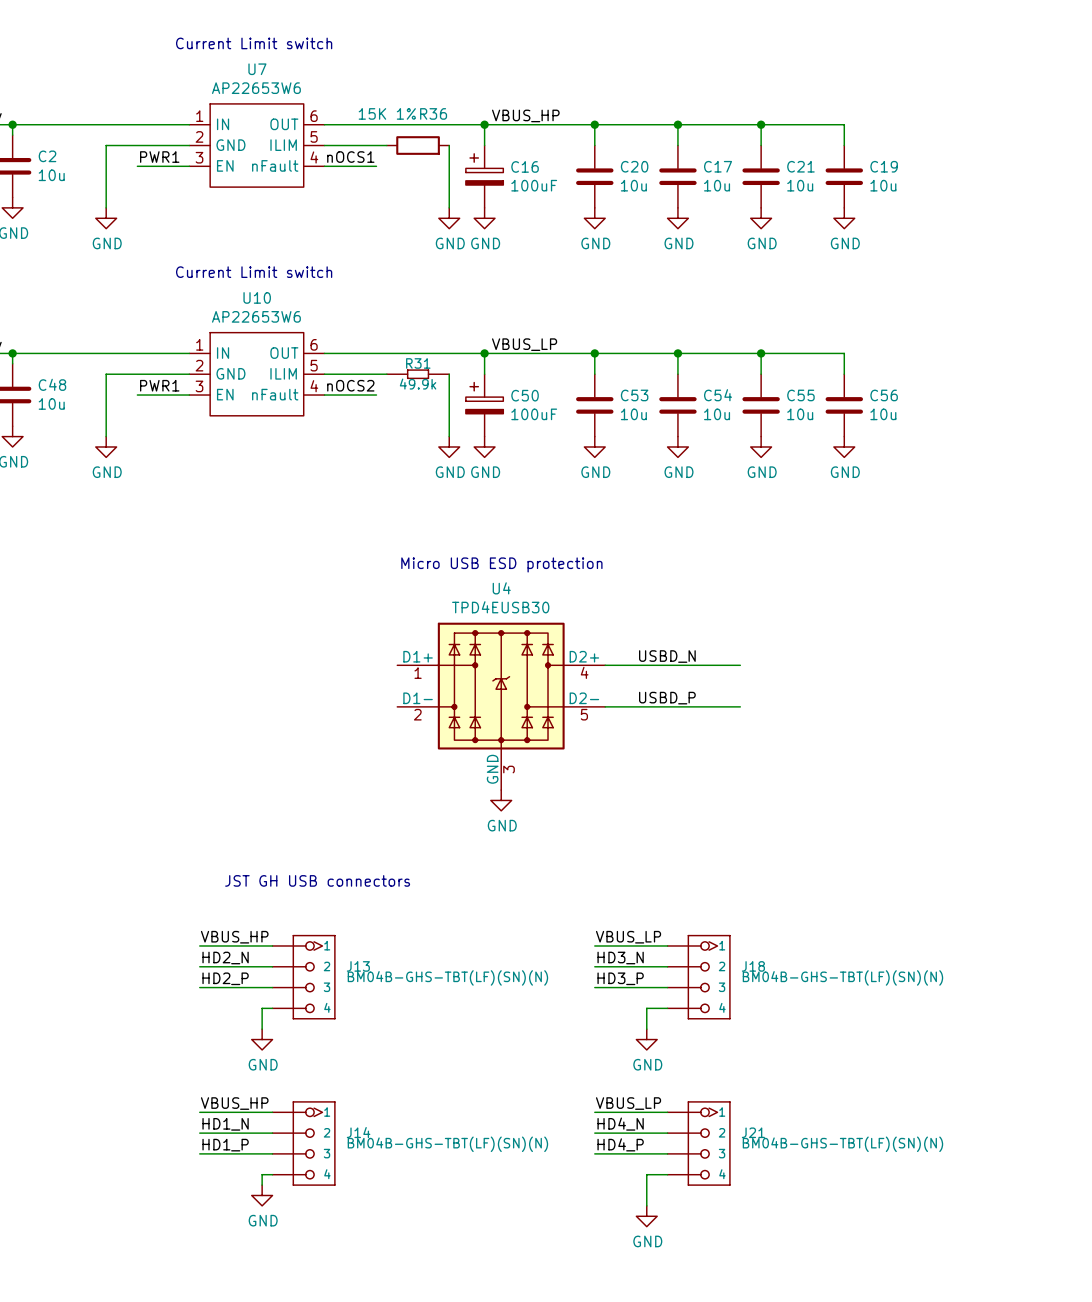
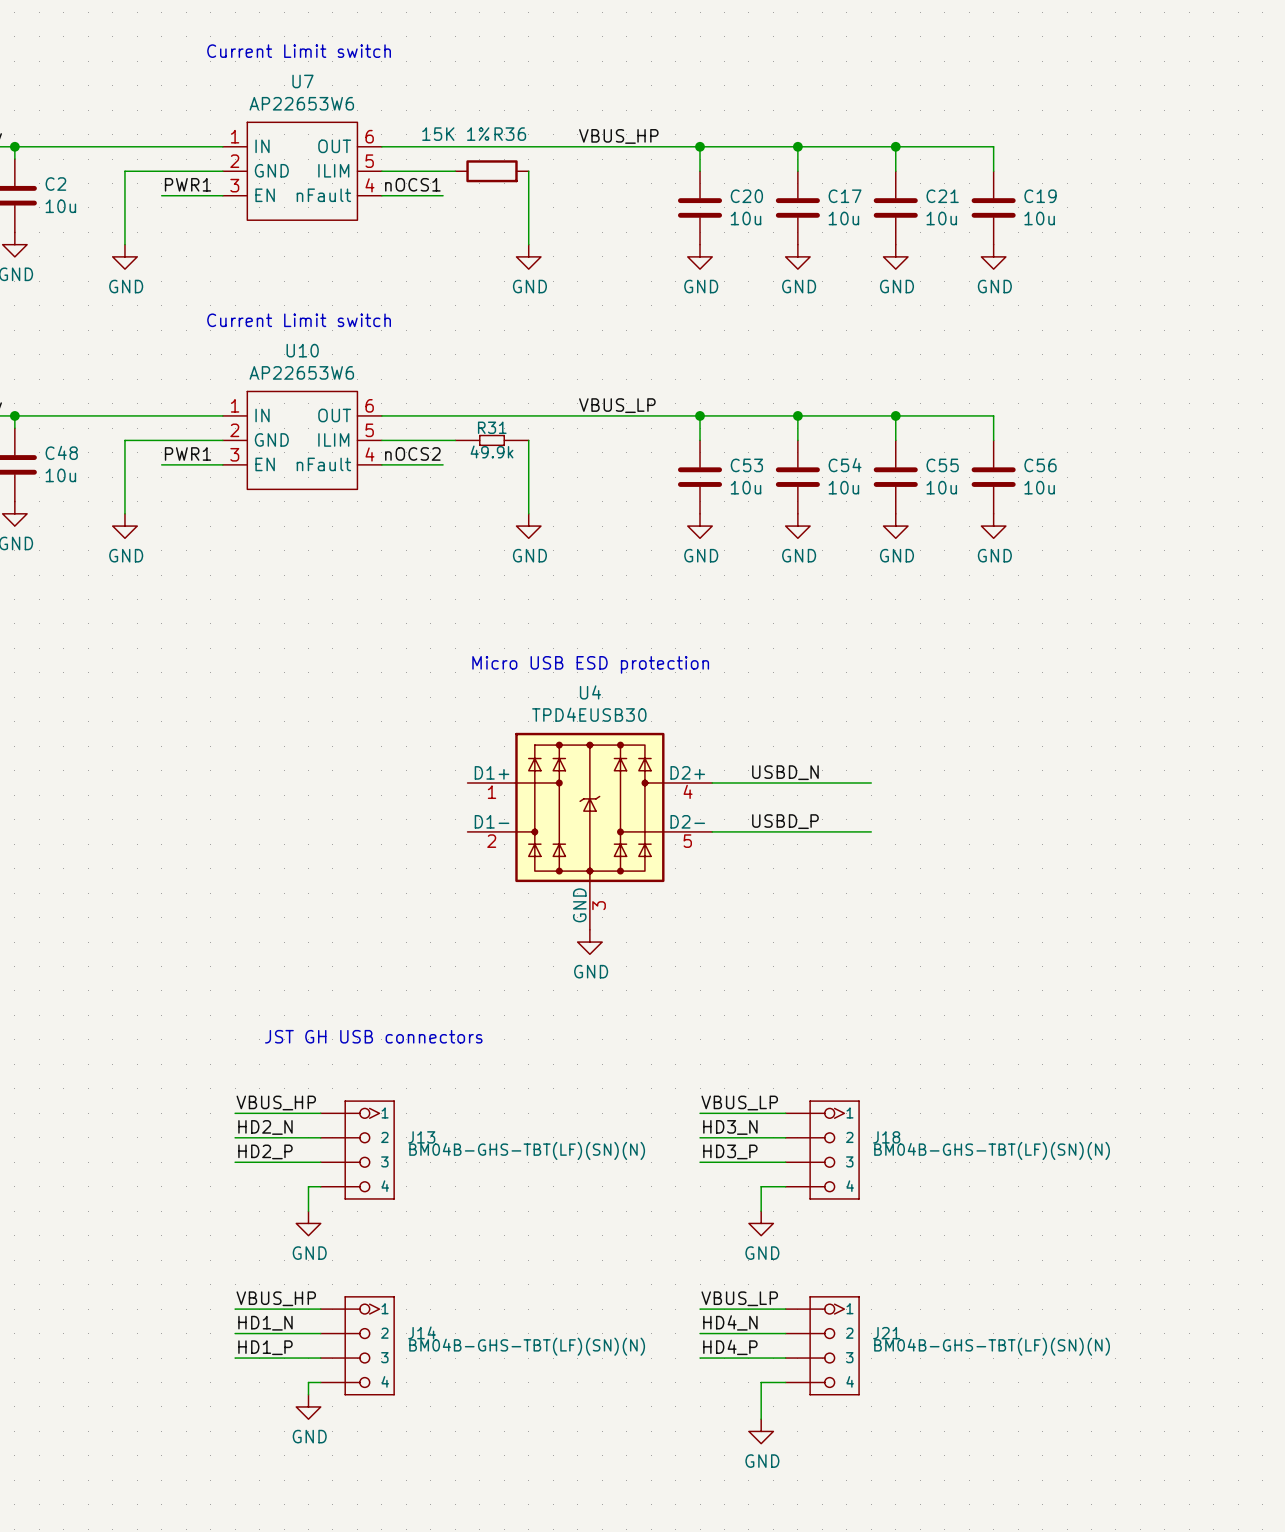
wire: (484, 124) (484, 145) -> none
junction: (484, 124) -> none
C16: 100uF (484, 176) -> none
power symbol: GND (484, 218) -> none
wire: (484, 353) (484, 374) -> none
junction: (484, 353) -> none
C50: 100uF (484, 405) -> none
power symbol: GND (484, 446) -> none

